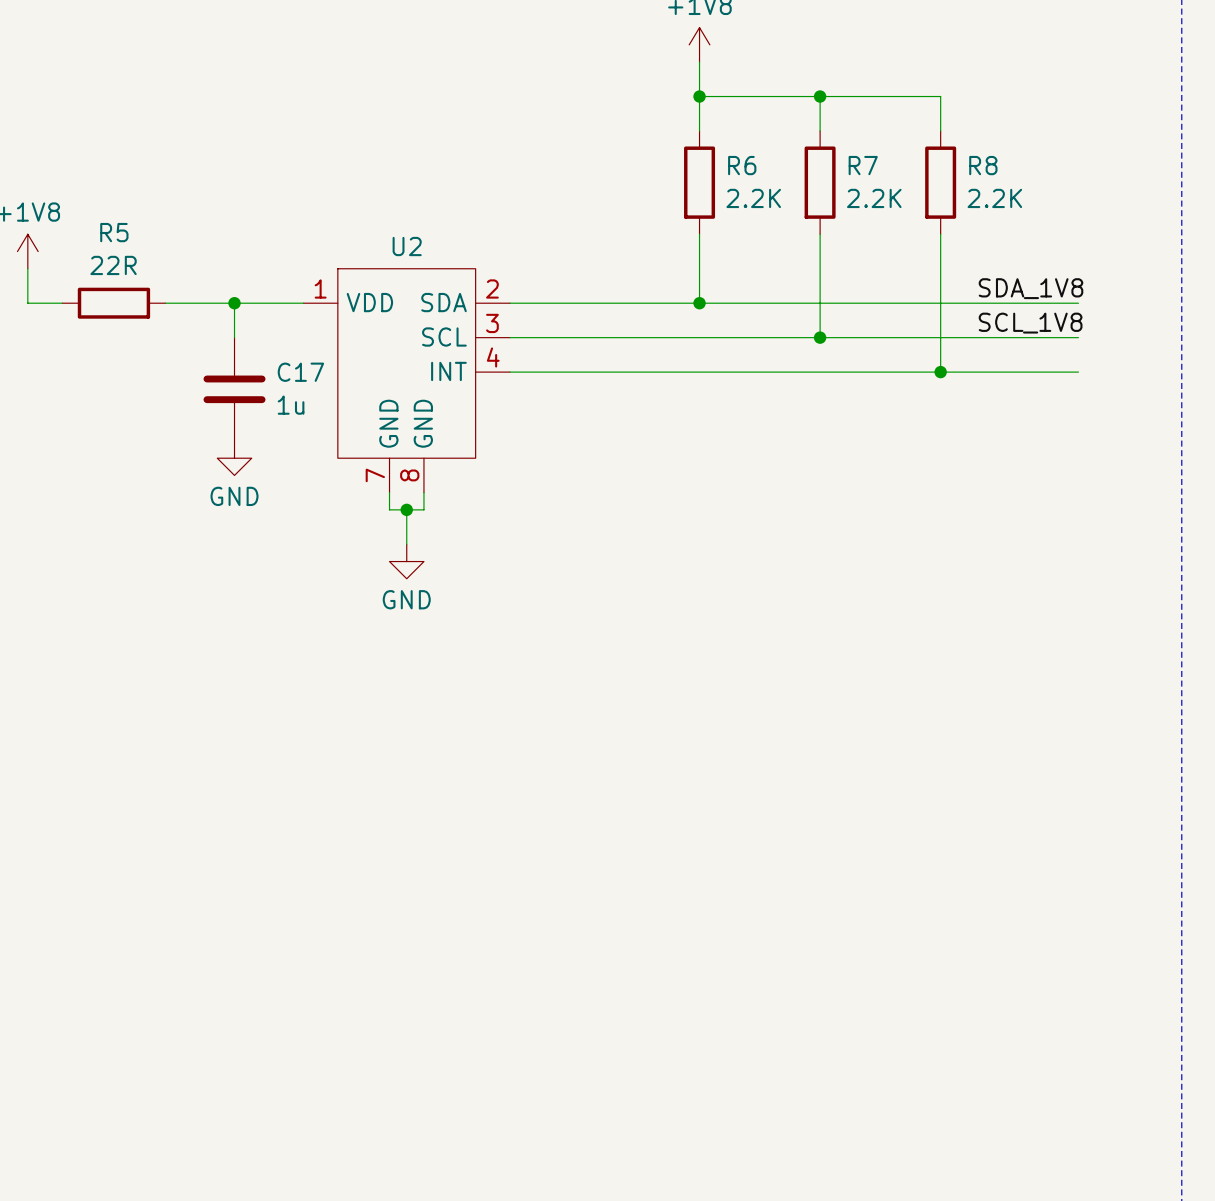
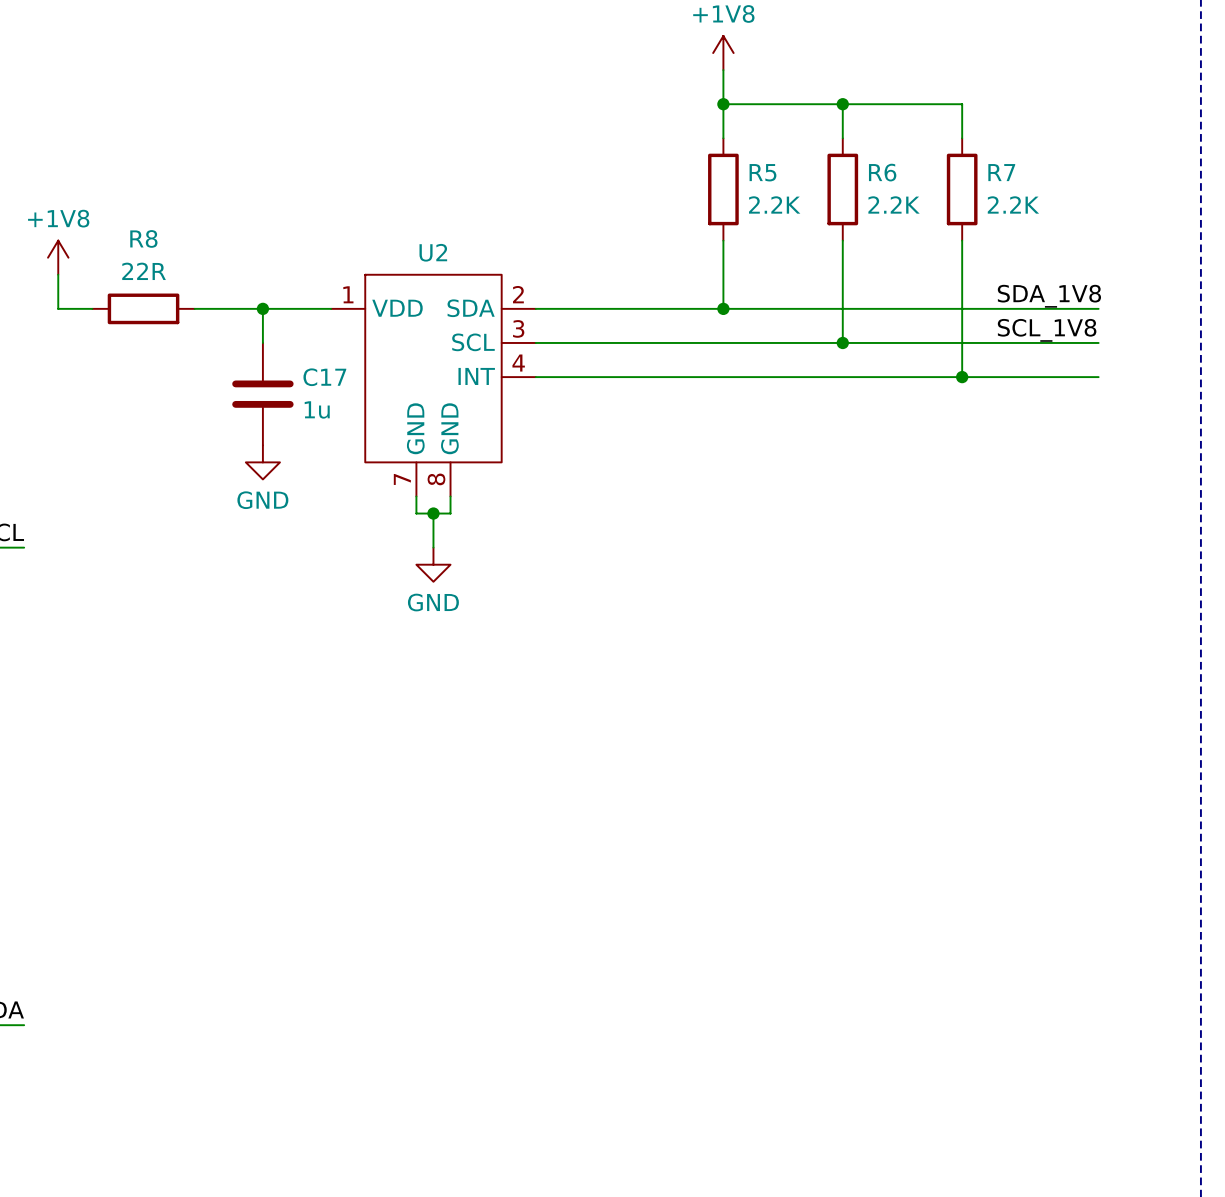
R6 name: R6 (742, 165) -> R5 (762, 172)
R7 name: R7 (863, 165) -> R6 (882, 172)
R8 name: R8 (983, 165) -> R7 (1001, 172)
R5 name: R5 (114, 232) -> R8 (143, 238)

